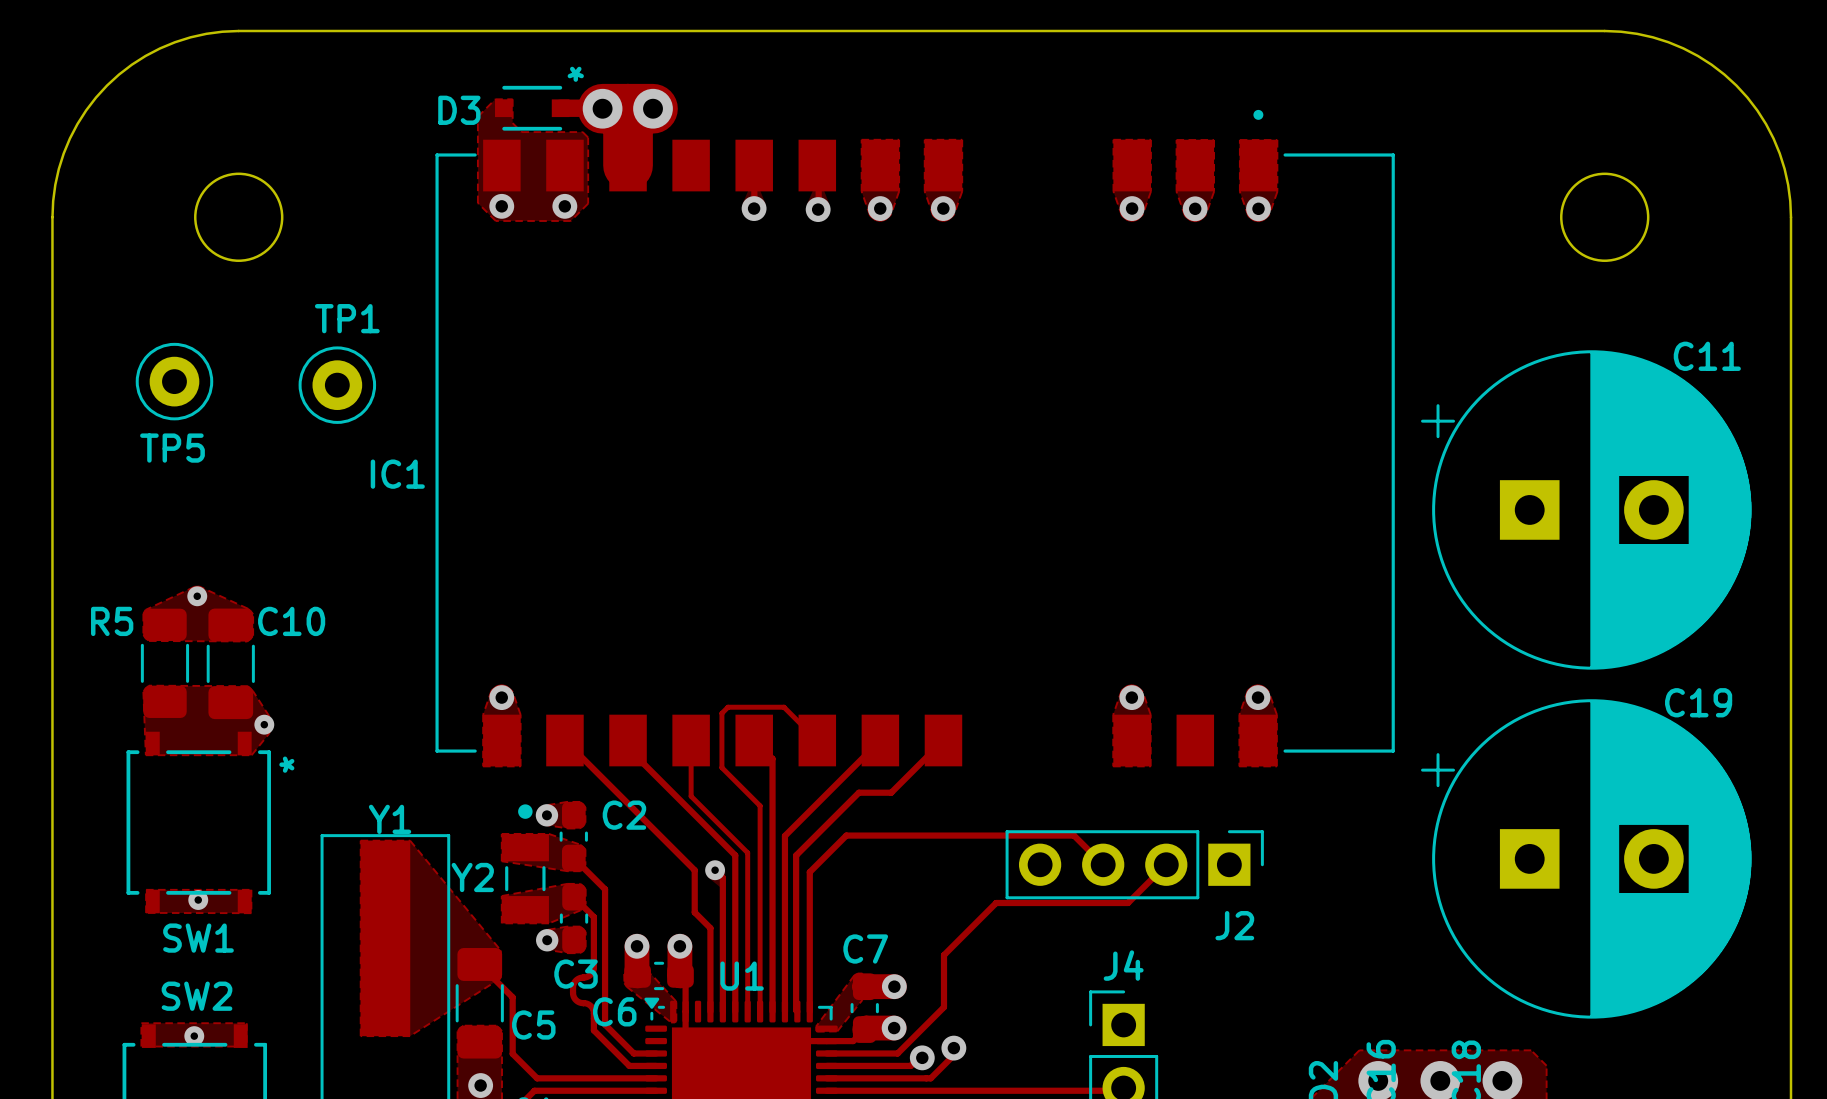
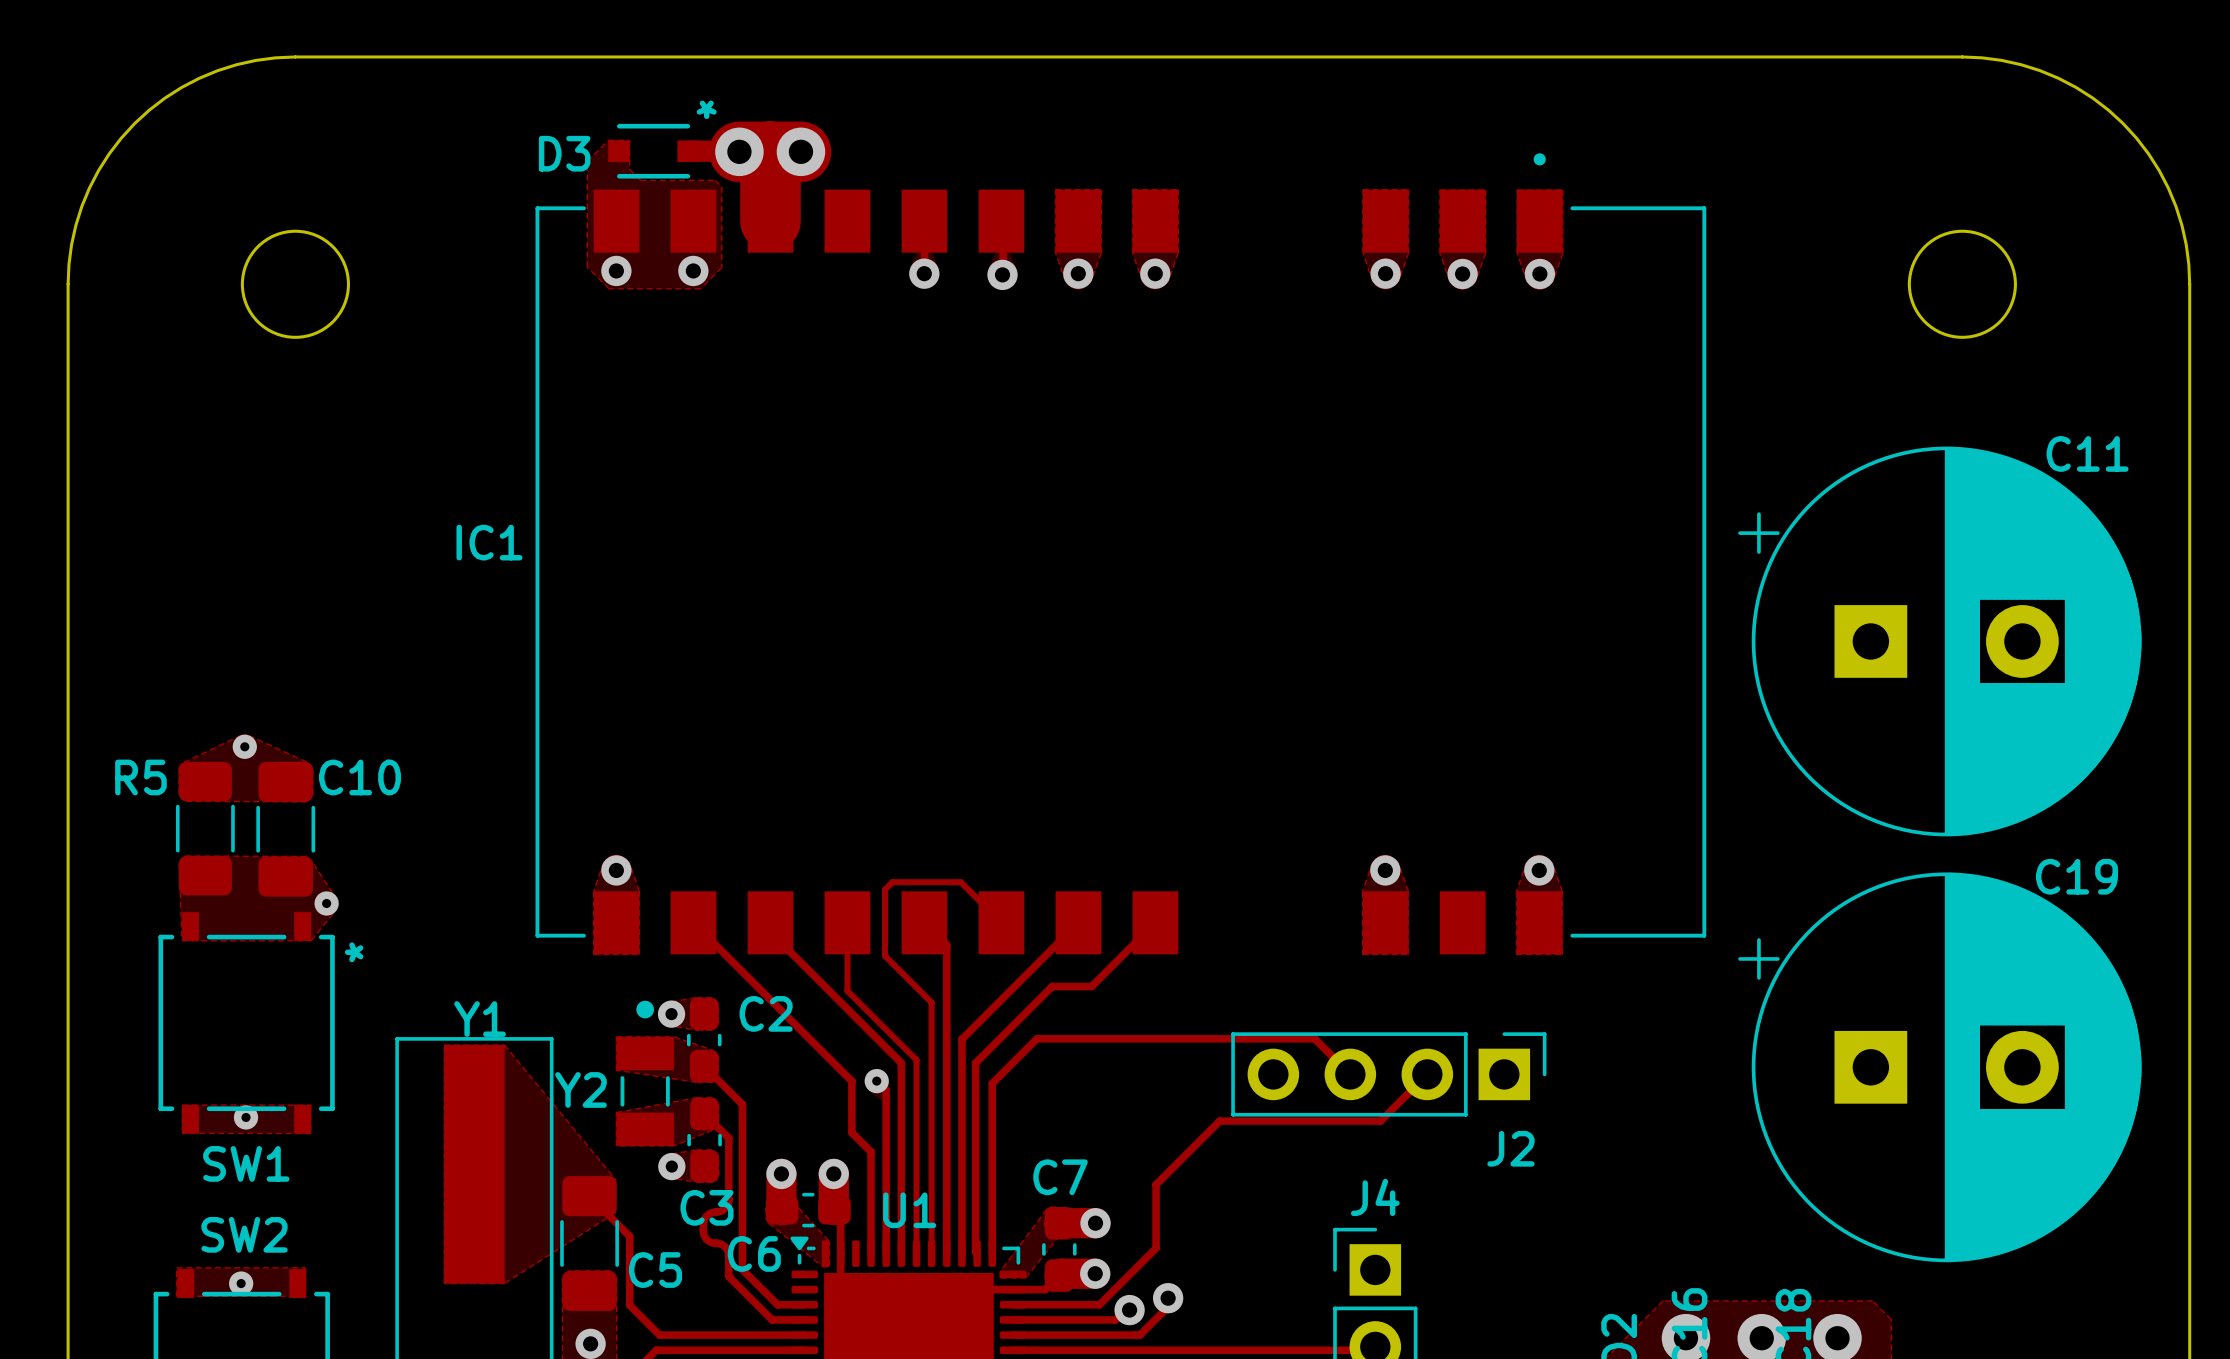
TP5: (174, 381) -> none
TP1: (337, 385) -> none
IC1 name position: IC1 (397, 474) -> IC1 (489, 542)

